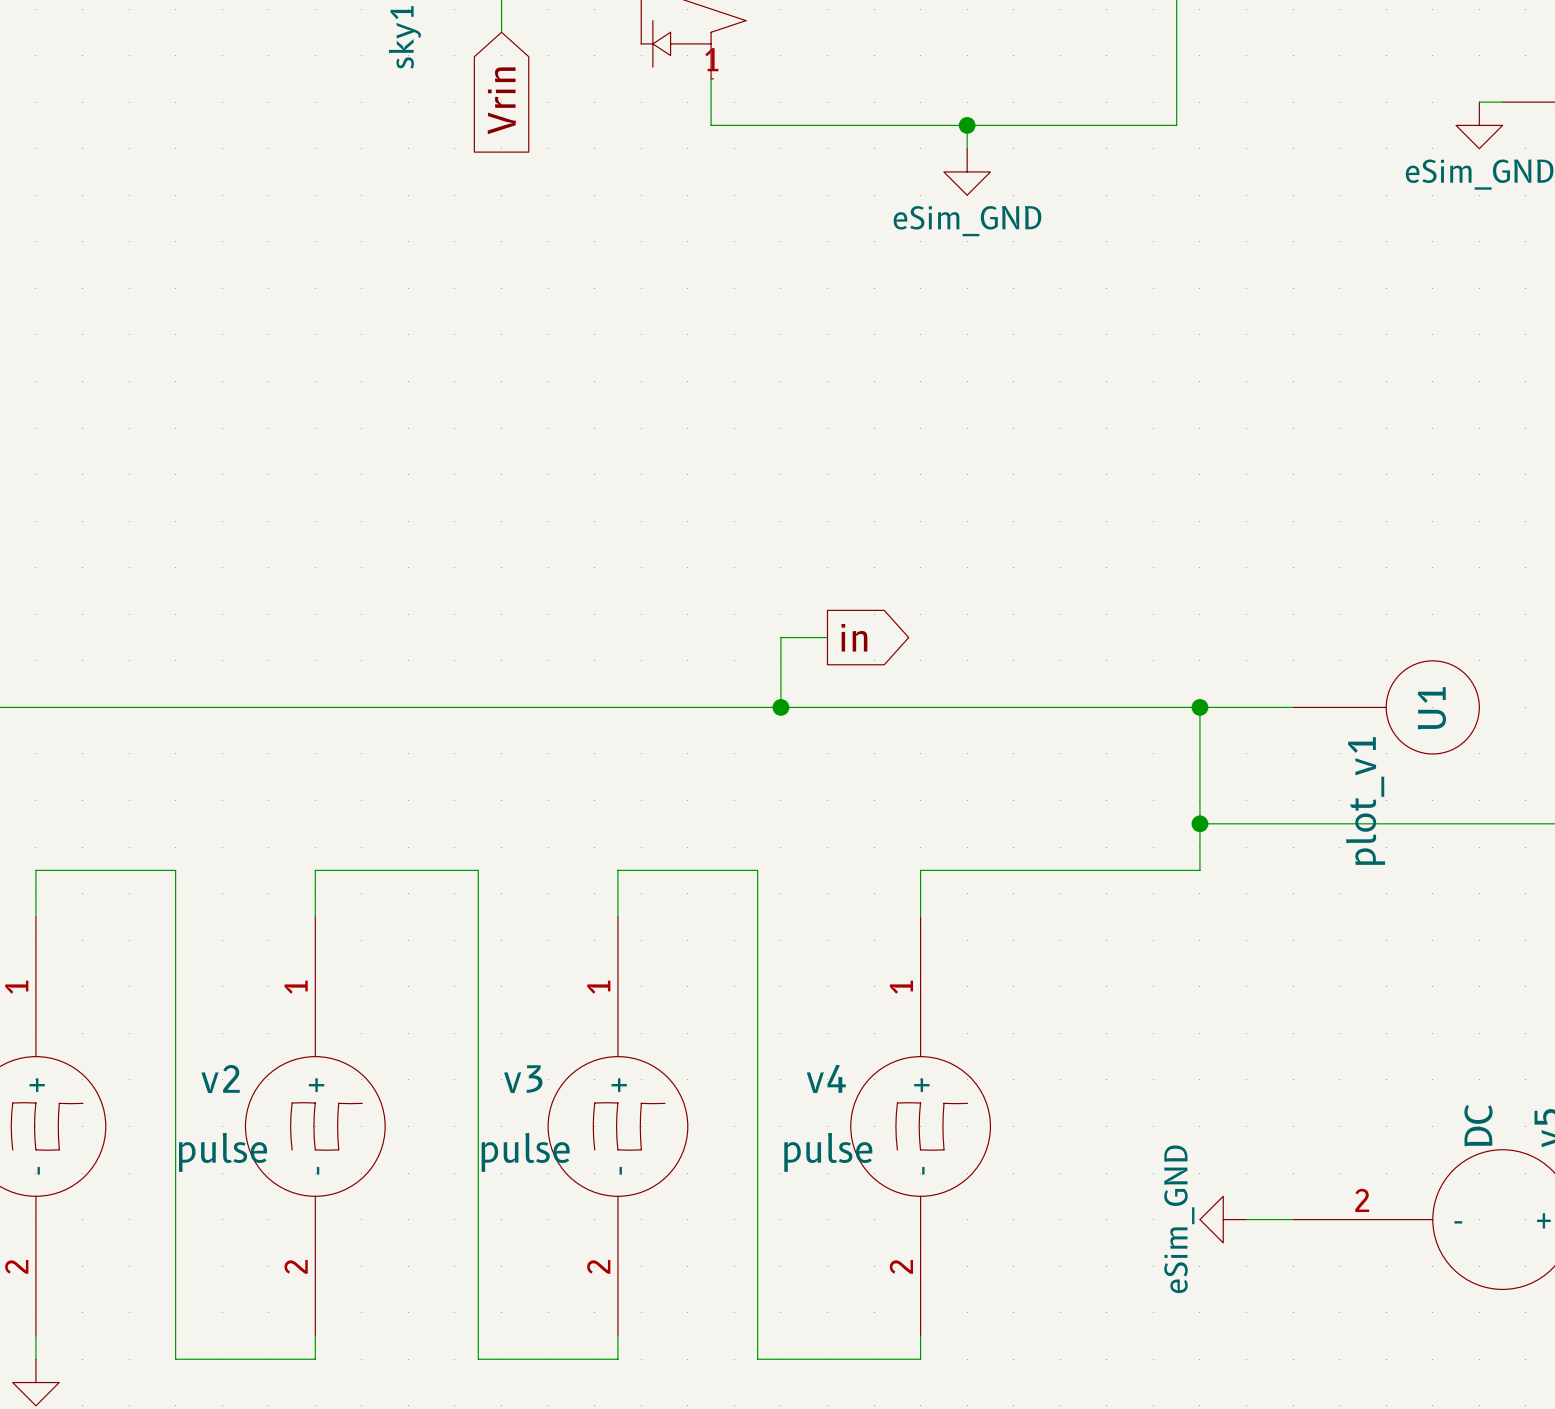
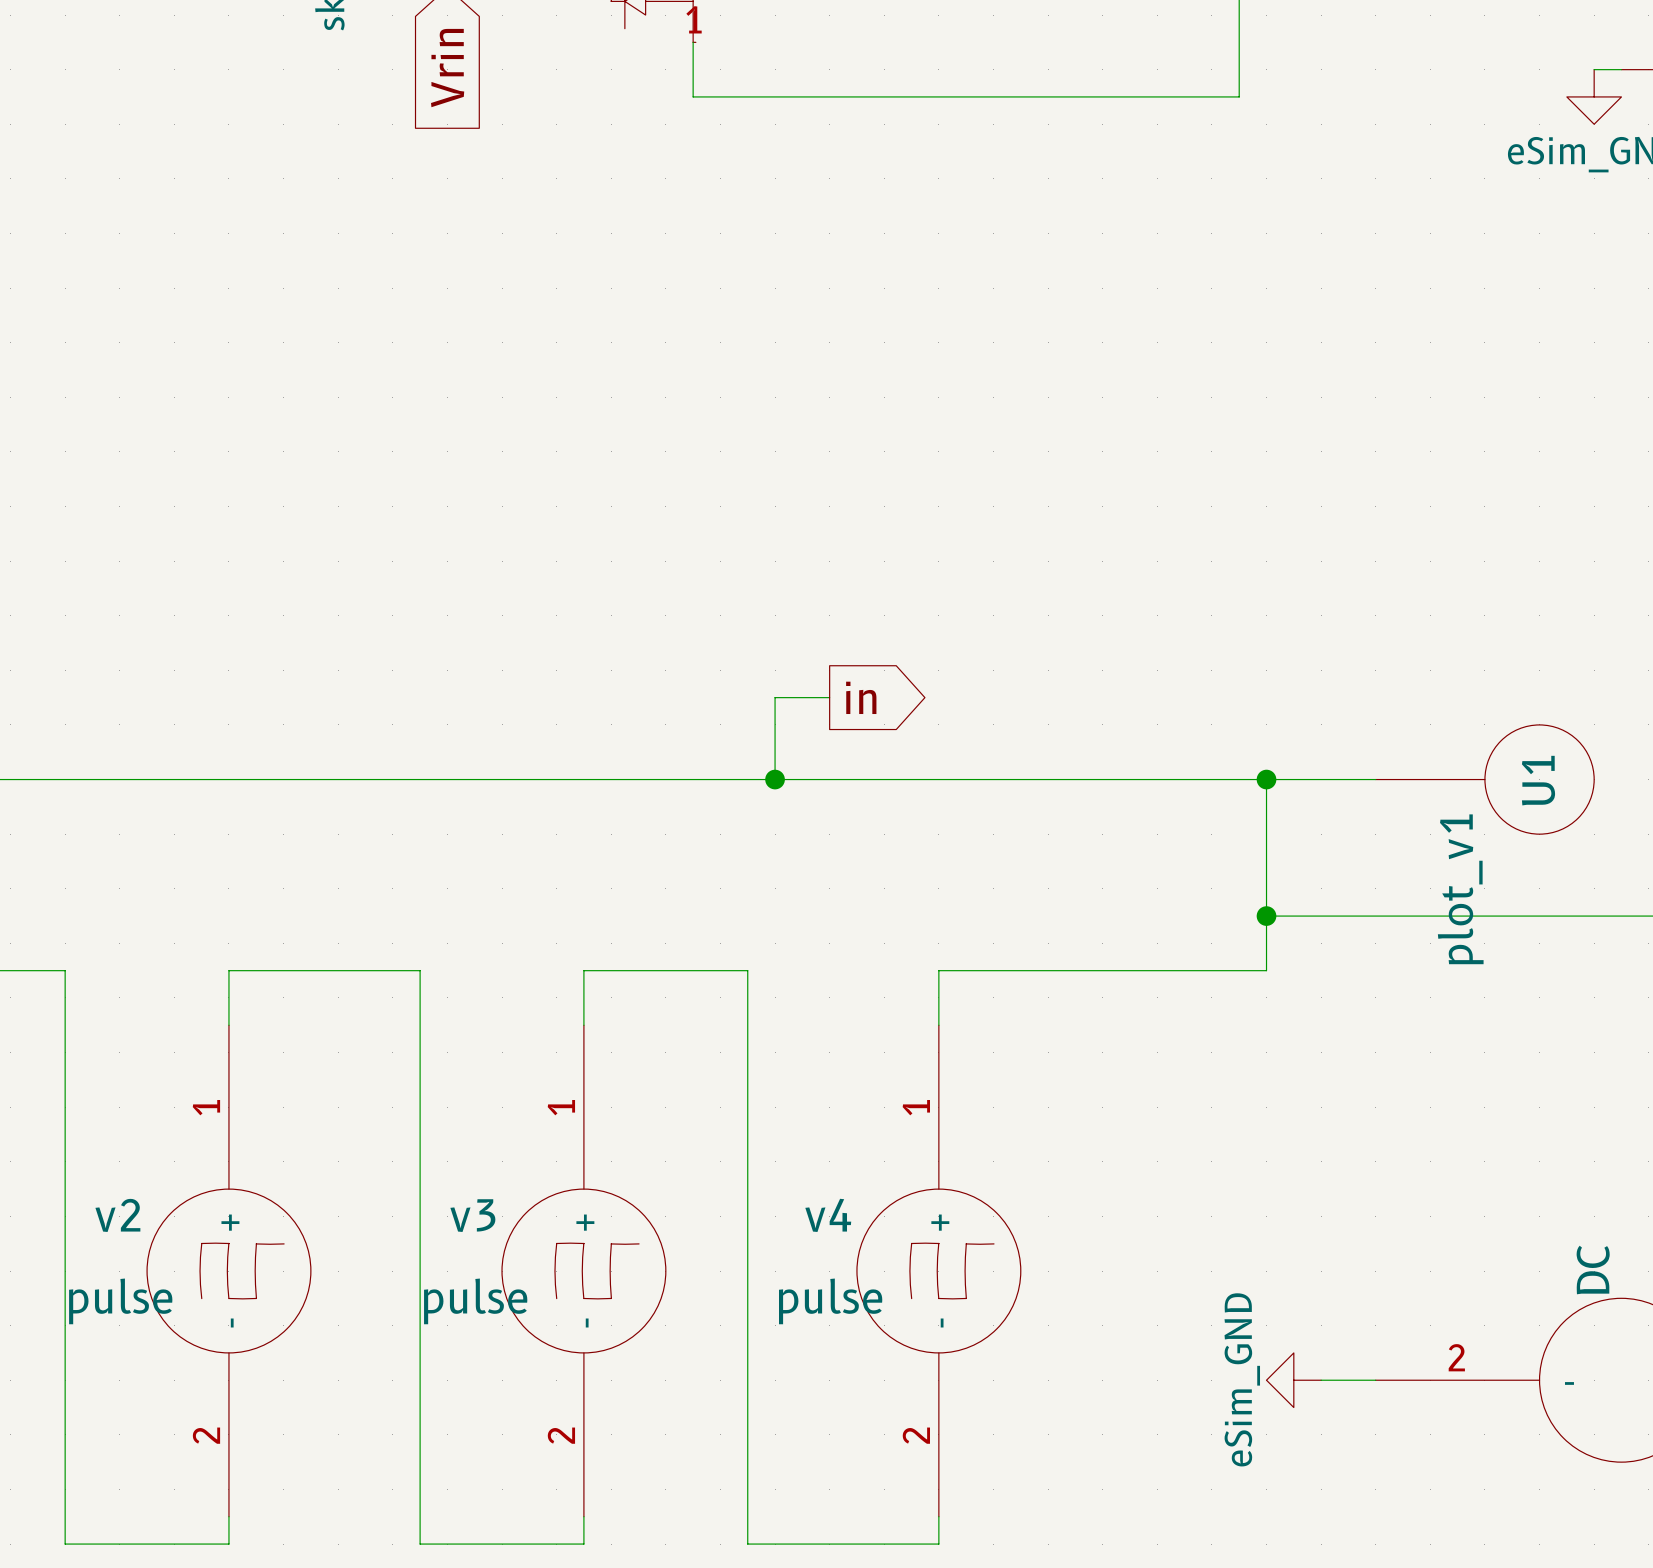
wire: (967, 125) (967, 148) -> none
junction: (967, 125) -> none
power symbol: eSim_GND (967, 171) -> none

